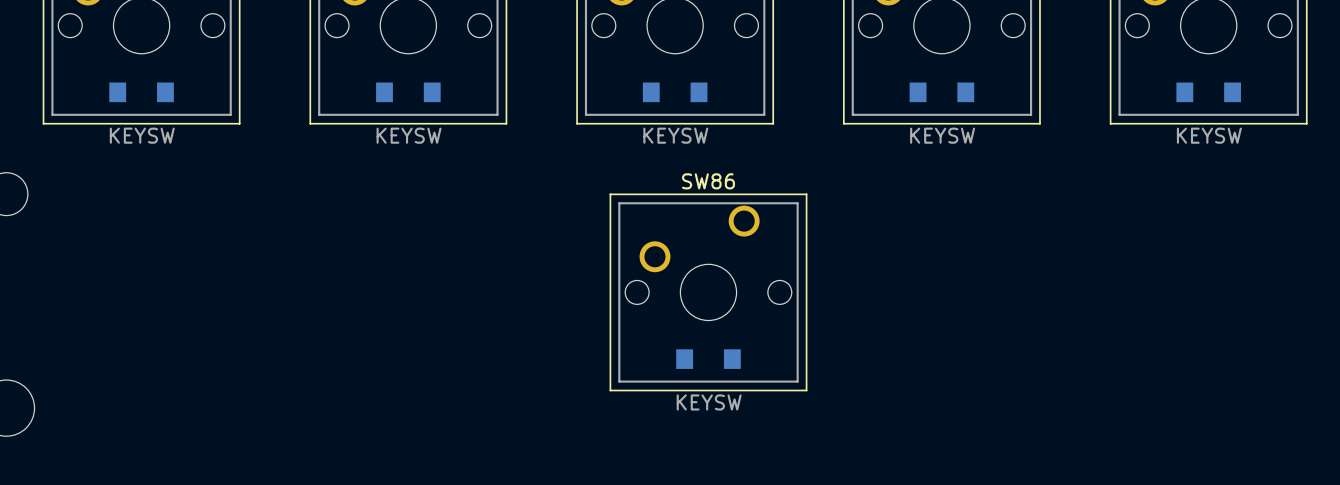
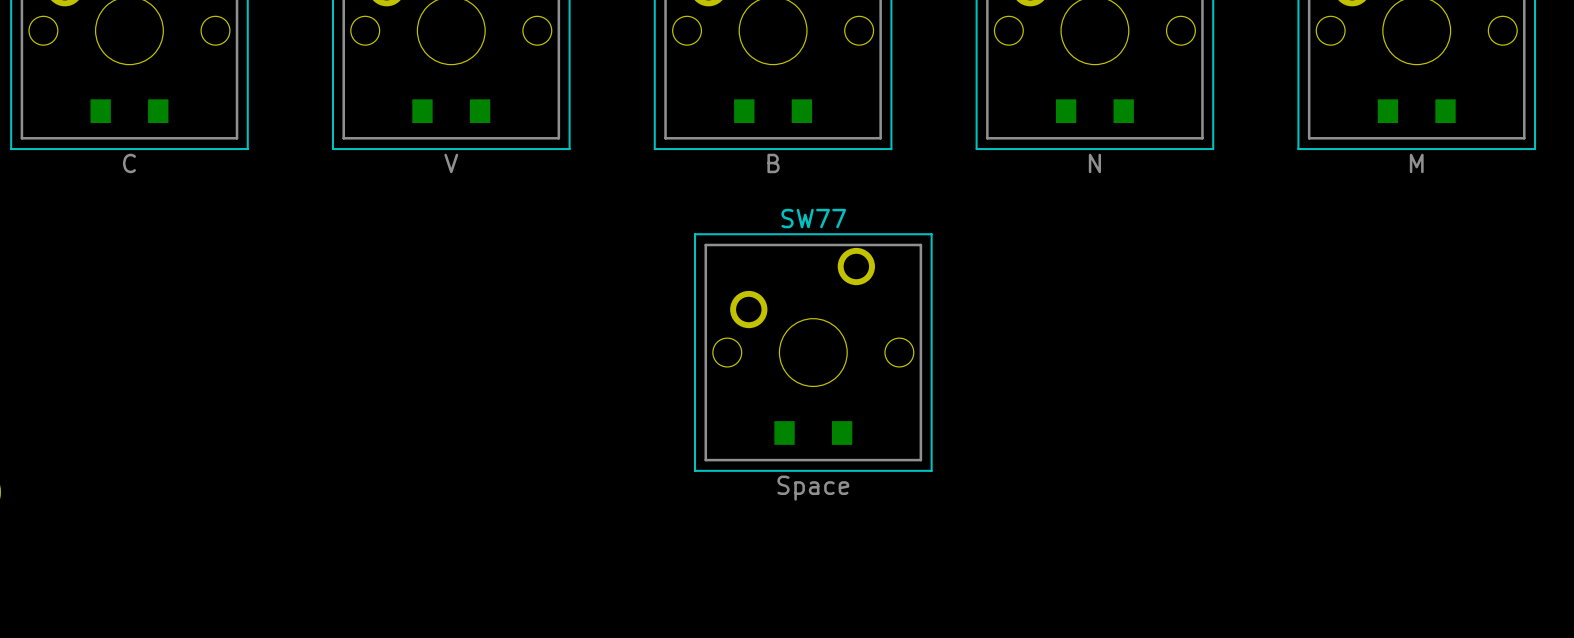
part value: KEYSW (142, 135) -> C (129, 163)
part value: KEYSW (409, 135) -> V (451, 163)
part value: KEYSW (675, 135) -> B (773, 163)
part value: KEYSW (942, 135) -> N (1094, 163)
part value: KEYSW (1209, 135) -> M (1416, 163)
SW86 name: SW86 (708, 181) -> SW77 (813, 218)
SW86 value: KEYSW (709, 402) -> Space (813, 488)

